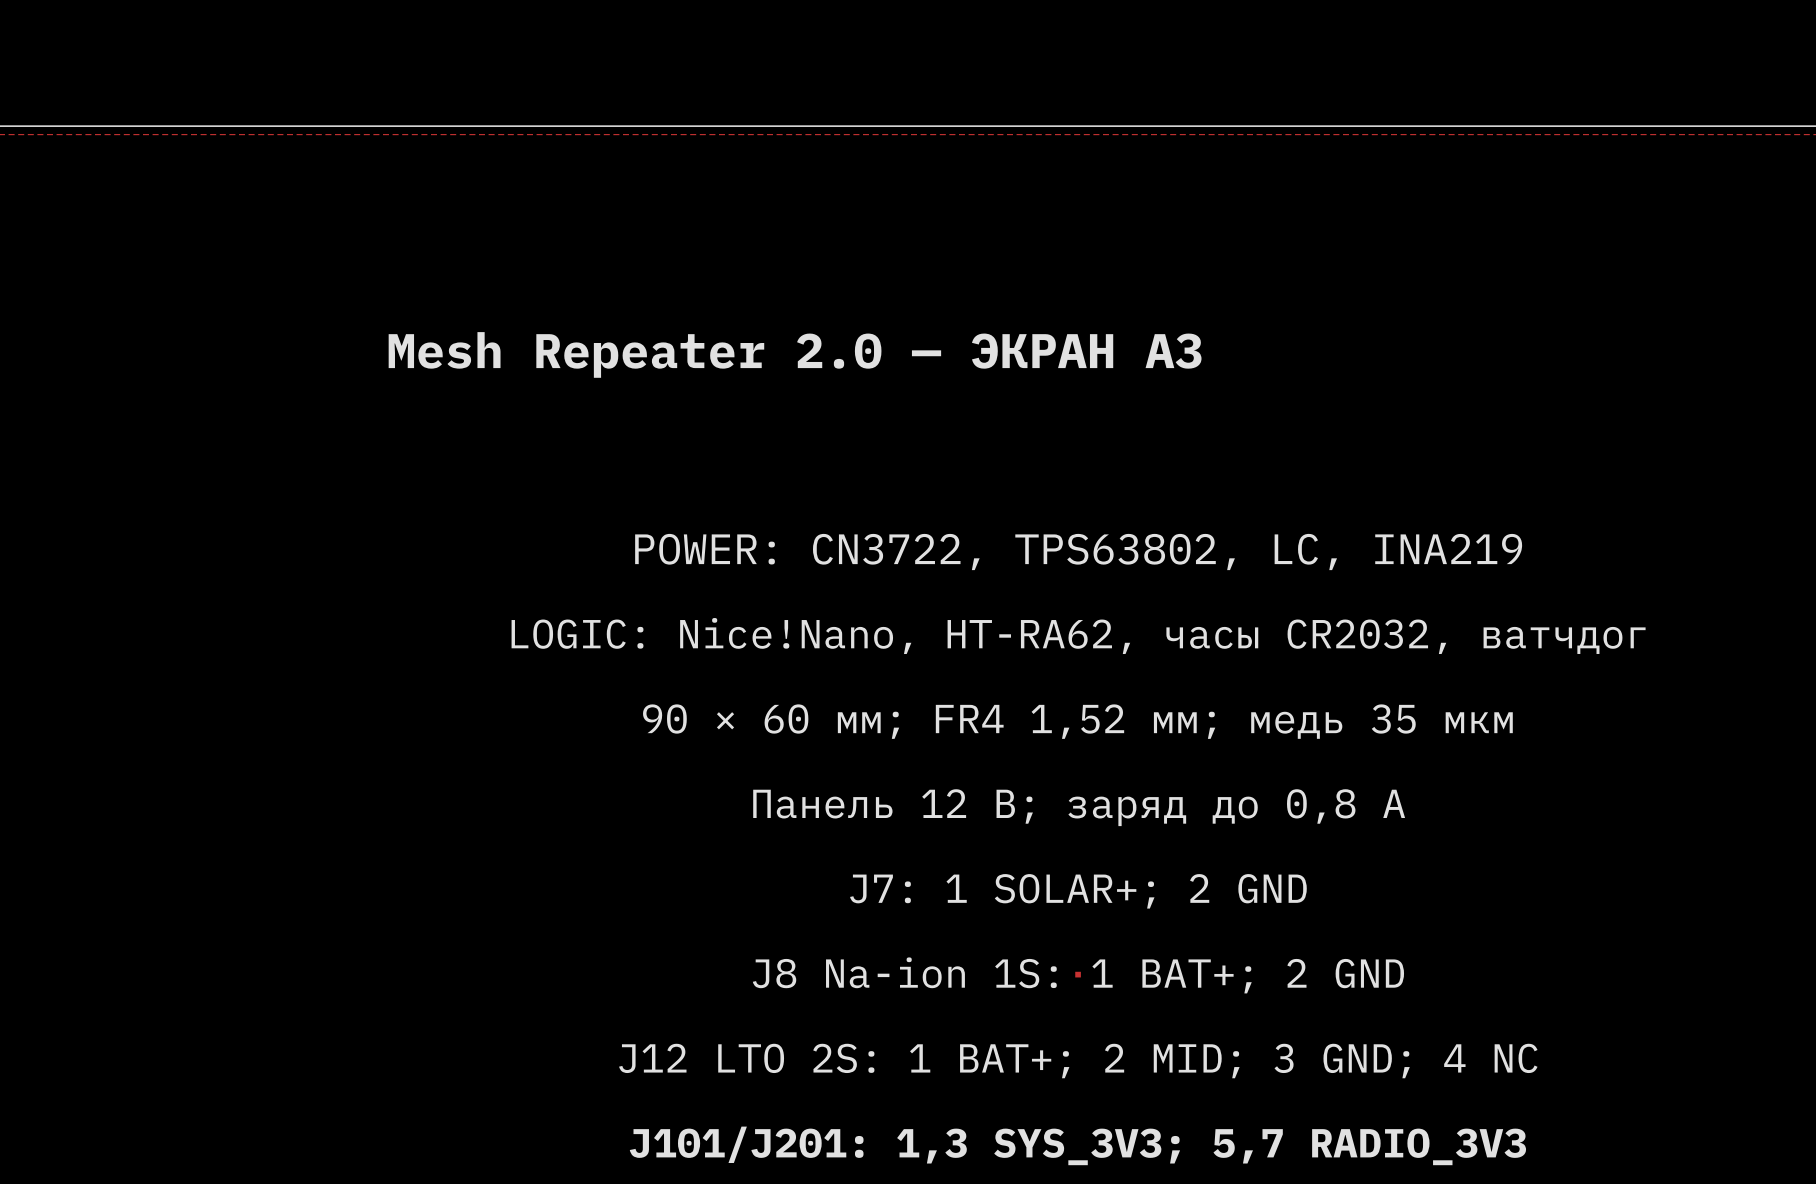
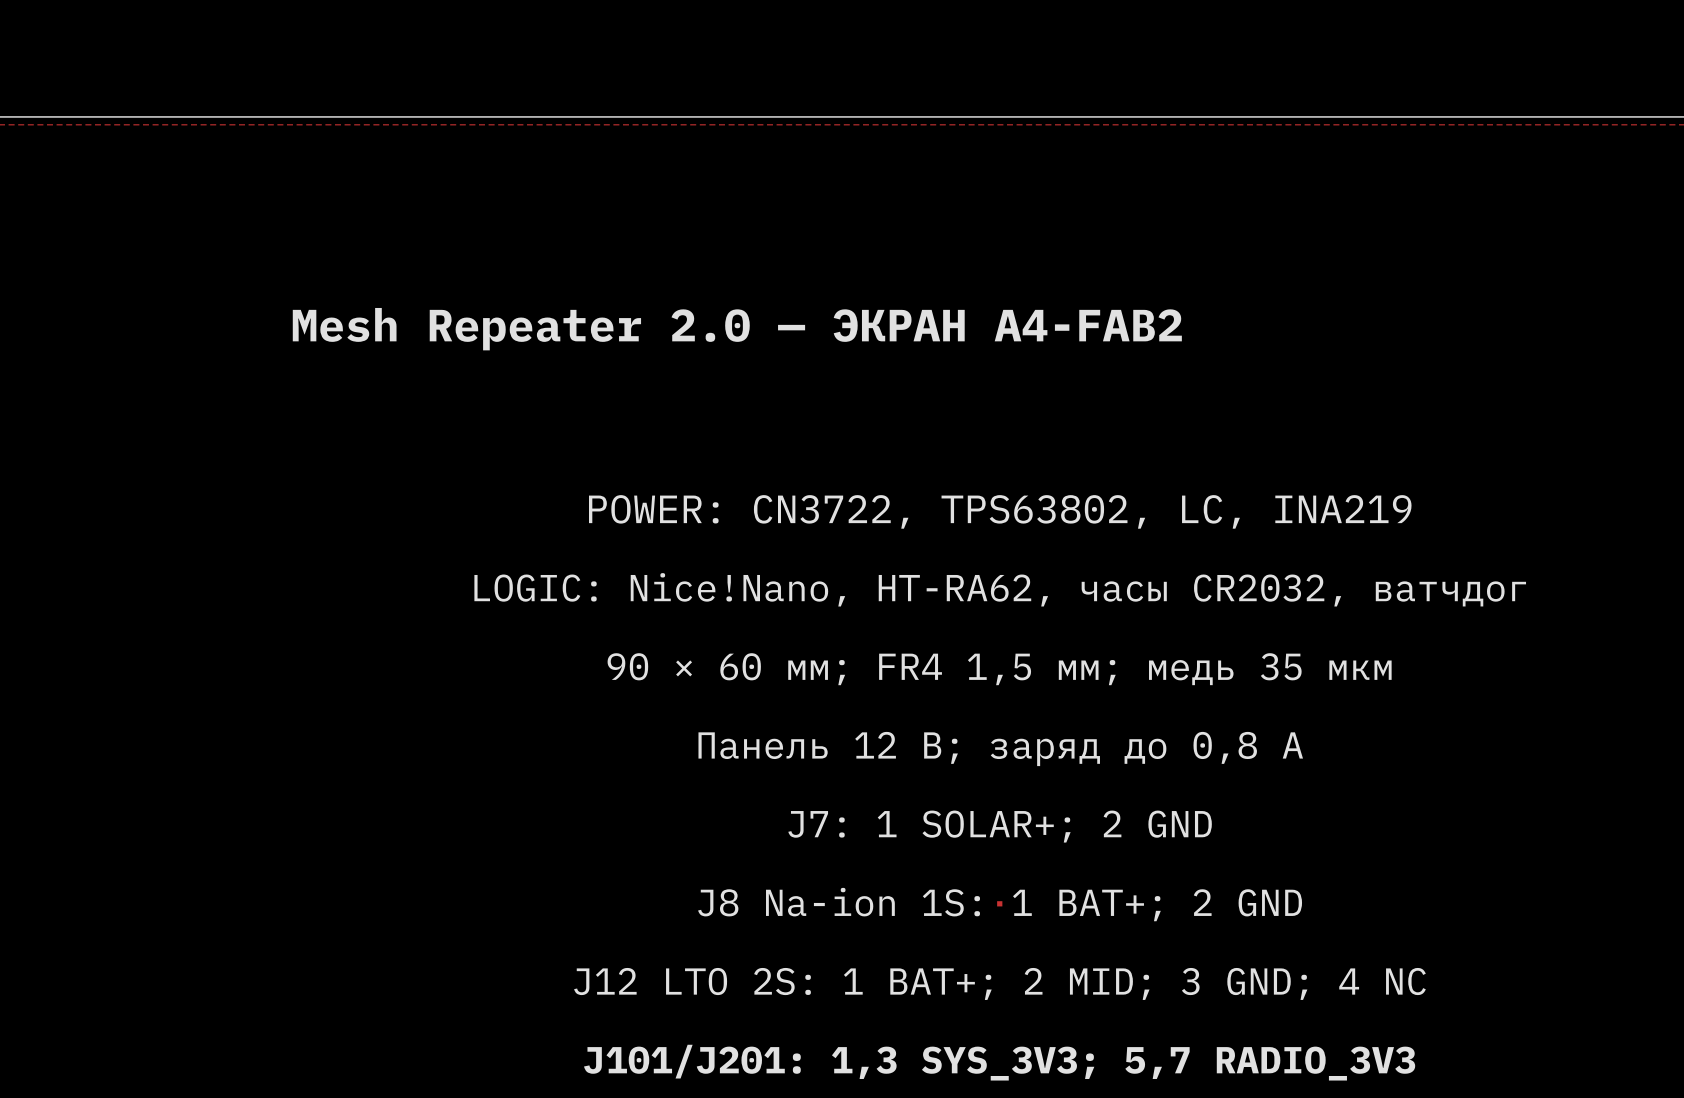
text: Mesh Repeater 2.0 — ЭКРАН A3 (795, 354) -> Mesh Repeater 2.0 — ЭКРАН A4-FAB2 (737, 329)
text: 90 × 60 мм; FR4 1,52 мм; медь 35 мкм (1077, 721) -> 90 × 60 мм; FR4 1,5 мм; медь 35 мкм (999, 669)

